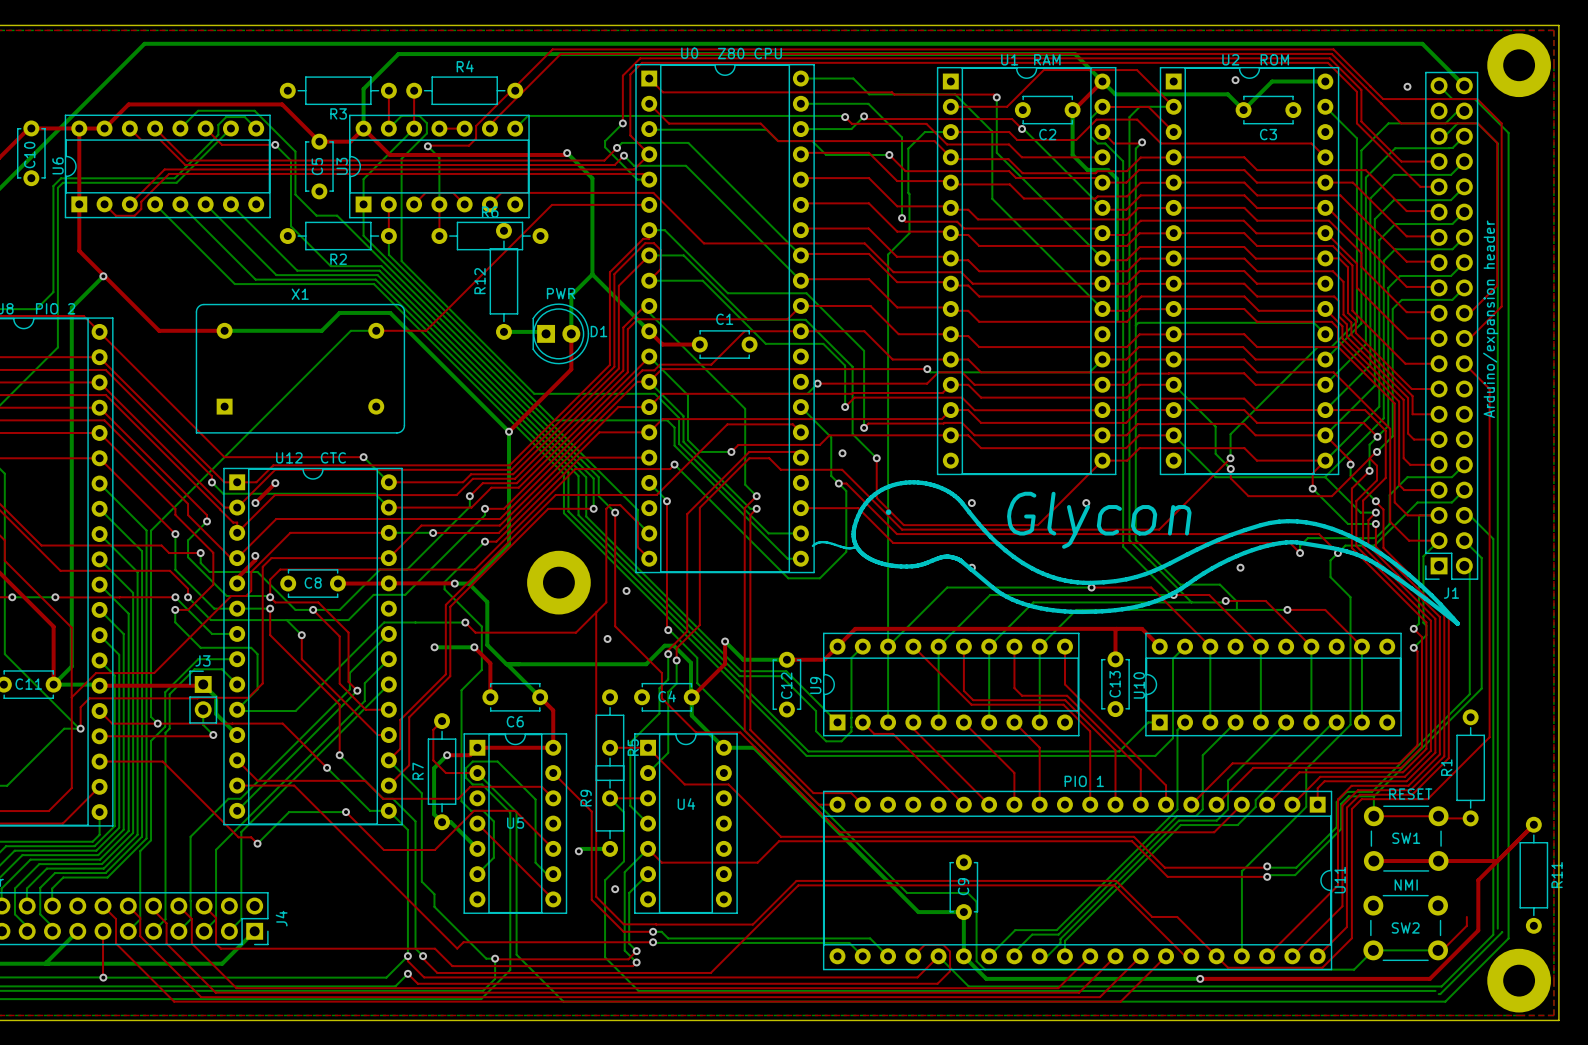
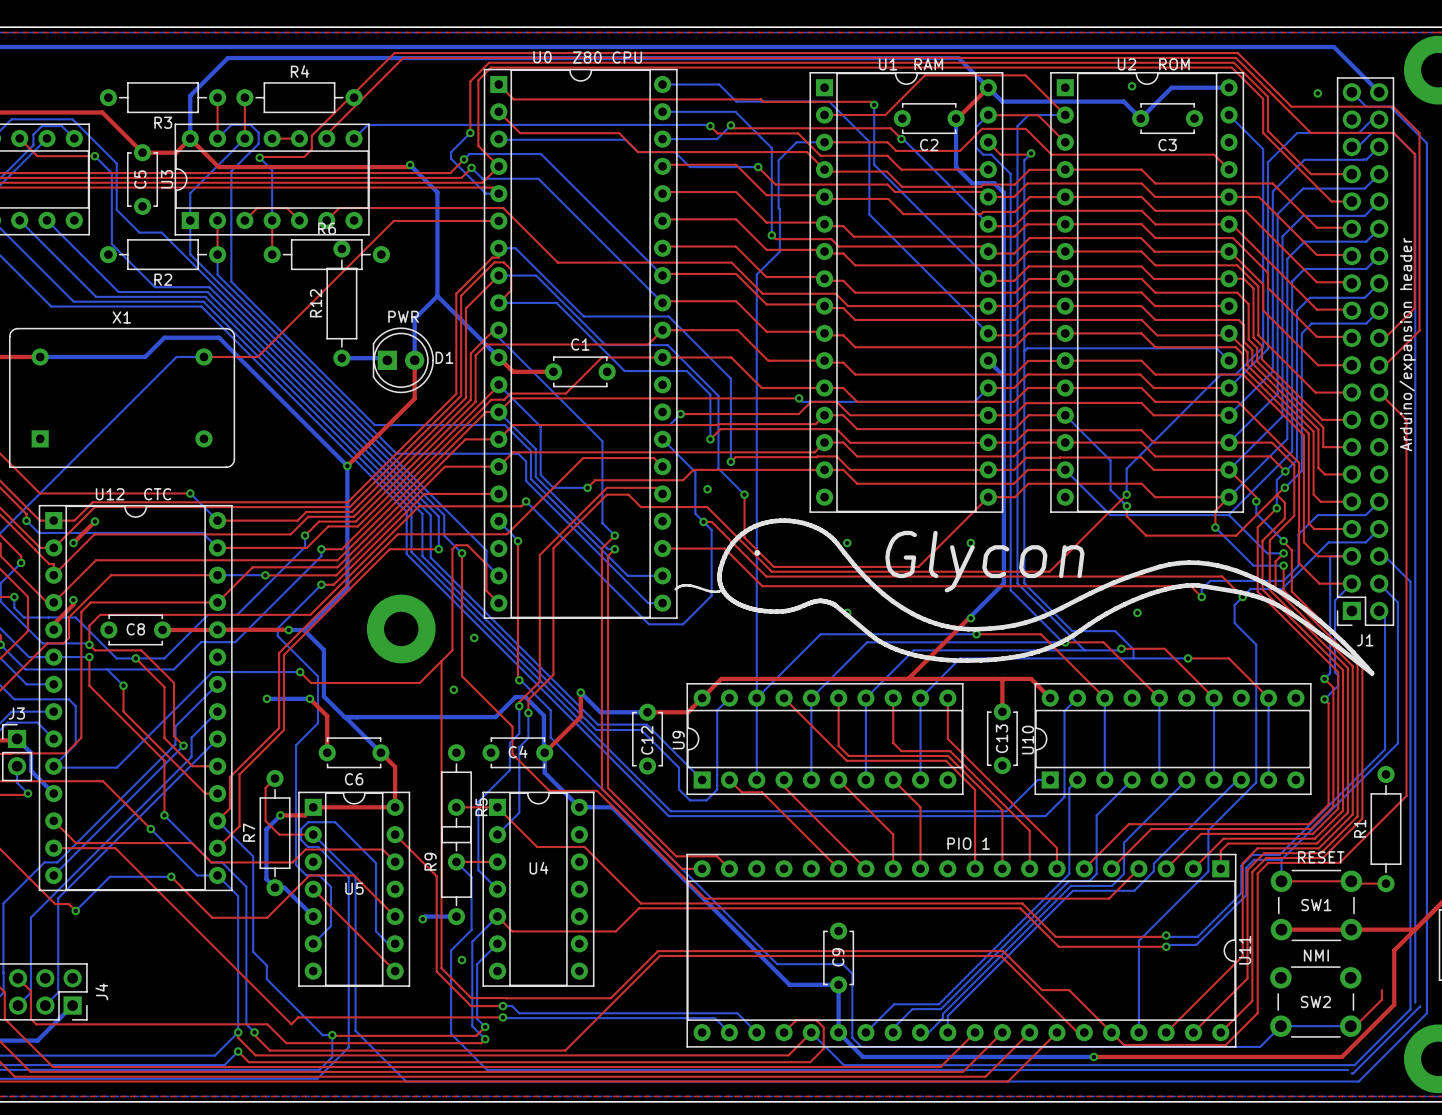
bottom track: none -> (1003, 345) (1003, 583) (970, 618)
bottom track: none -> (988, 360) (1003, 376)
top track: none -> (970, 618) (908, 678)
via: none -> (970, 618)

